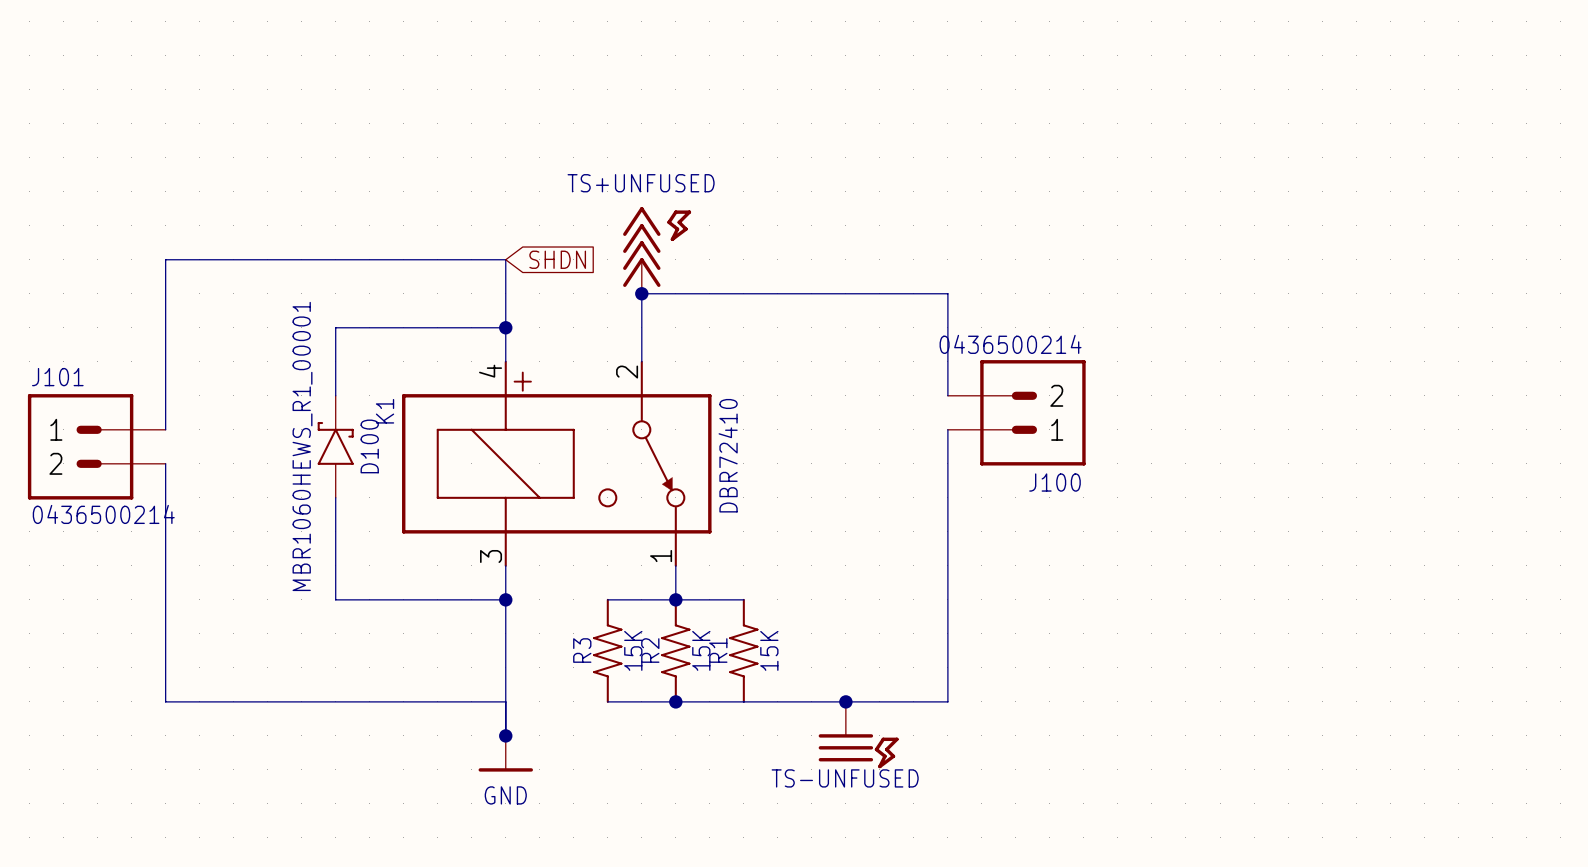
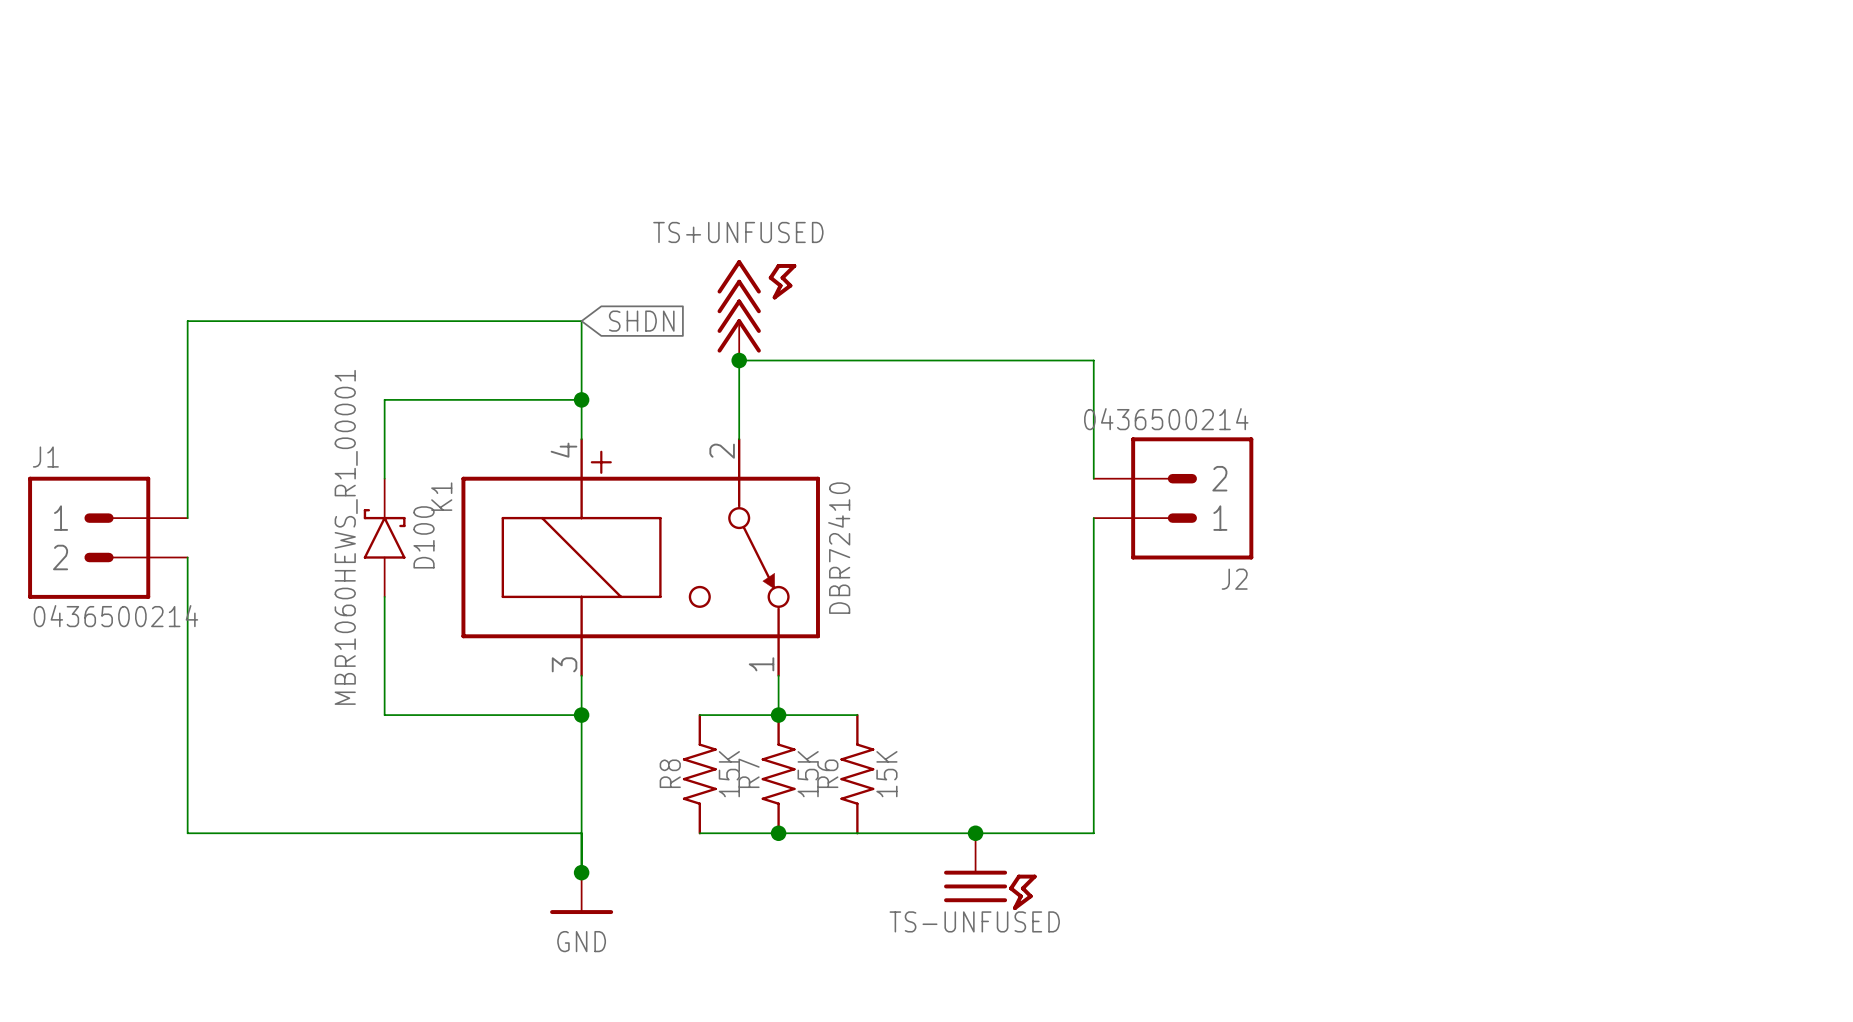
J101 name: J101 (57, 377) -> J1 (45, 457)
J100 name: J100 (1055, 482) -> J2 (1234, 579)
R3 name: R3 (582, 650) -> R8 (670, 773)
R2 name: R2 (650, 650) -> R7 (749, 773)
R1 name: R1 (718, 650) -> R6 (827, 773)

